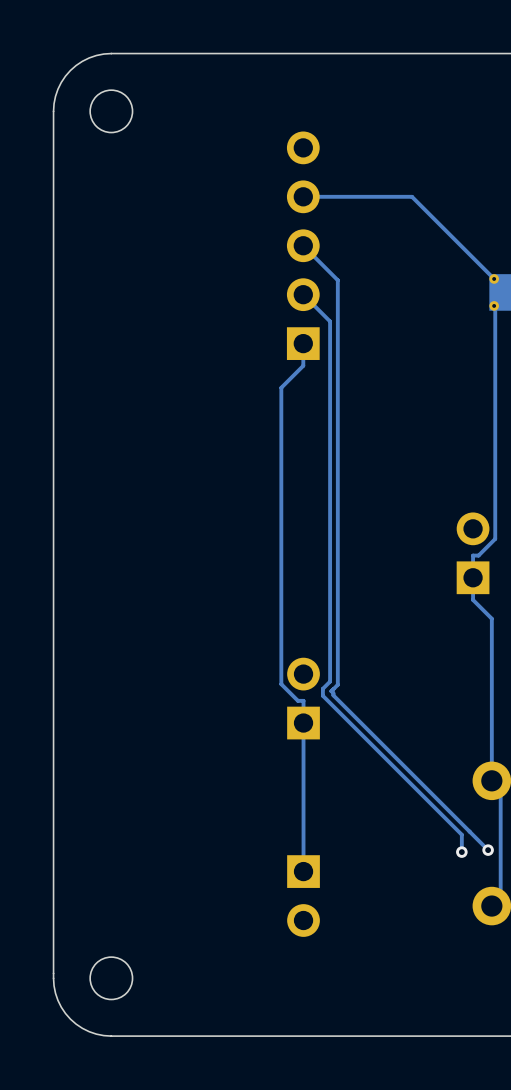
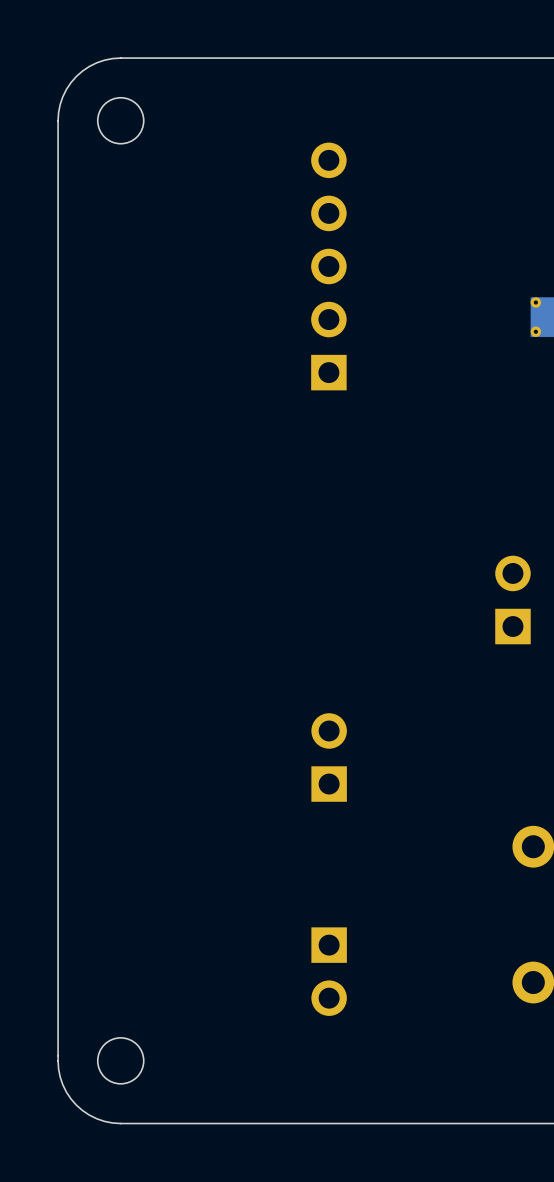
track: (303, 196) (412, 196) (494, 278) -> none
track: (303, 245) (337, 280) (337, 684) (331, 691) (488, 850) -> none
track: (303, 294) (330, 321) (330, 681) (322, 688) (322, 695) (461, 834) (461, 852) -> none
track: (494, 305) (495, 538) (478, 555) (473, 555) (473, 599) (491, 618) (491, 780) (500, 789) (500, 897) (491, 906) -> none
track: (303, 343) (303, 365) (281, 387) (281, 684) (297, 700) (303, 700) (303, 871) -> none
via: (488, 850) -> none
via: (461, 852) -> none

